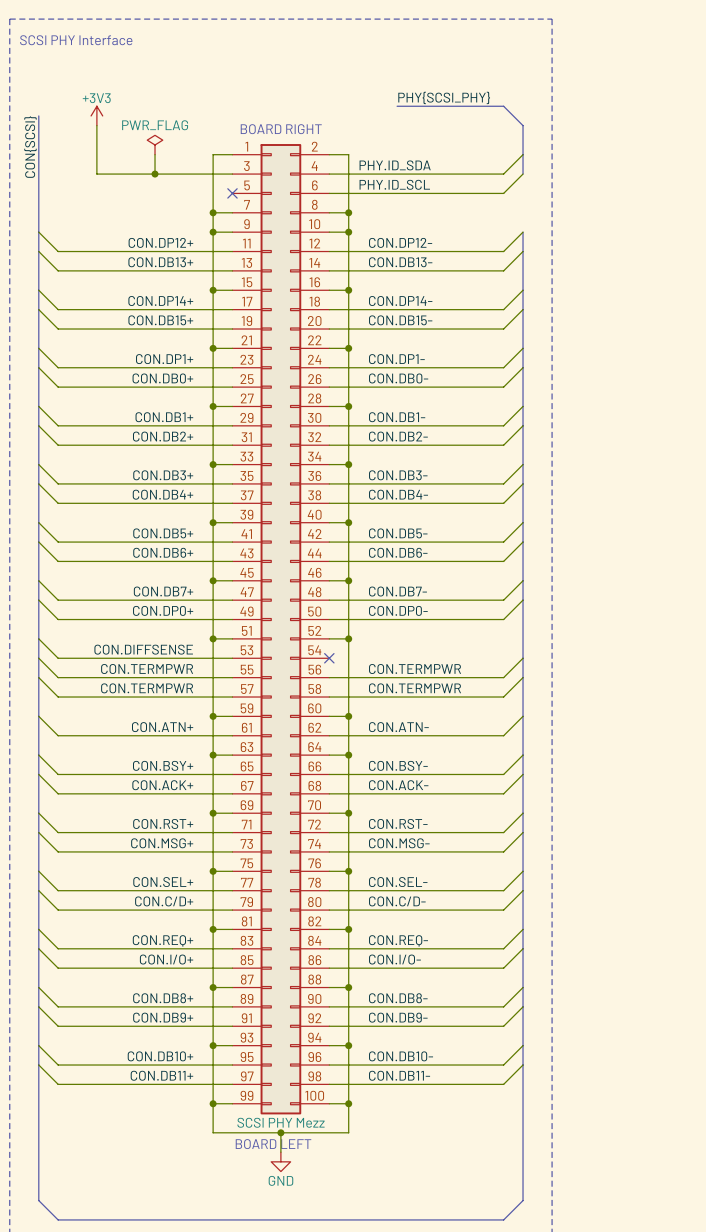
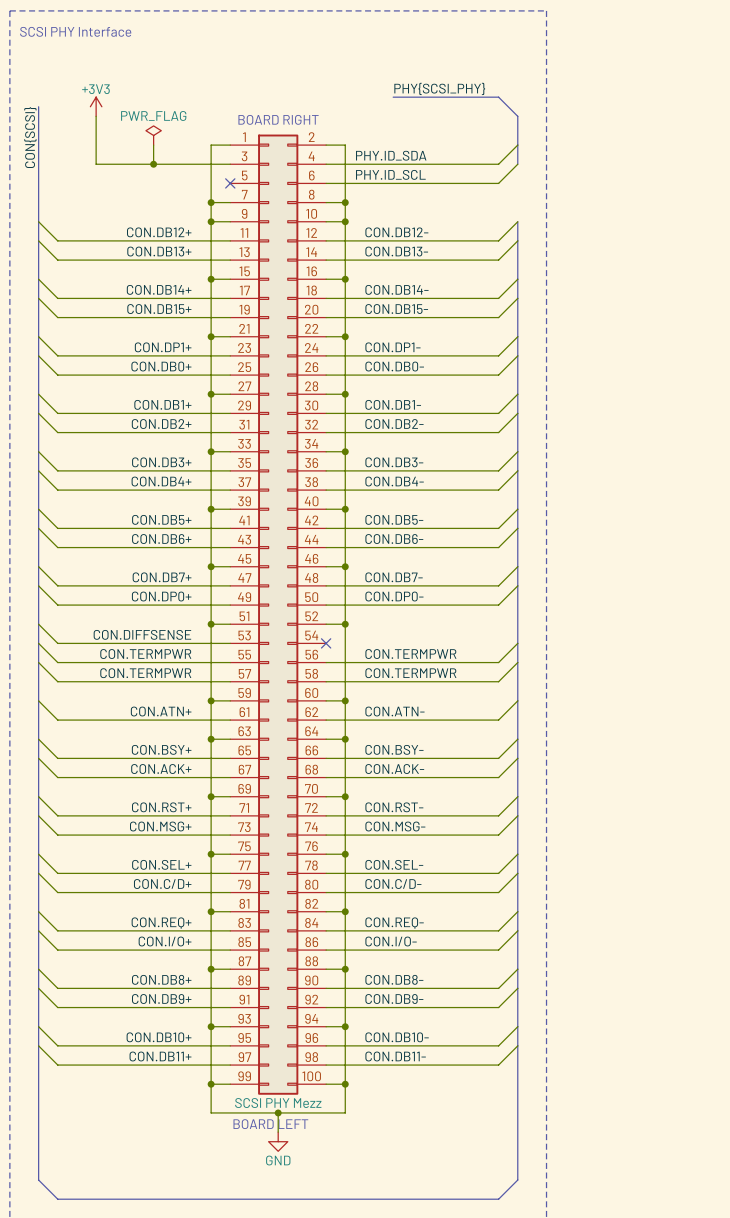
label: CON.DP12+ (160, 242) -> CON.DB12+ (159, 232)
label: CON.DP12- (400, 242) -> CON.DB12- (396, 232)
label: CON.DP14+ (160, 301) -> CON.DB14+ (159, 289)
label: CON.DP14- (400, 301) -> CON.DB14- (397, 289)

